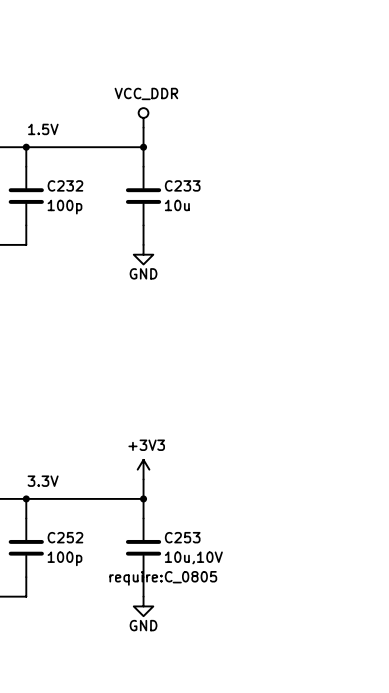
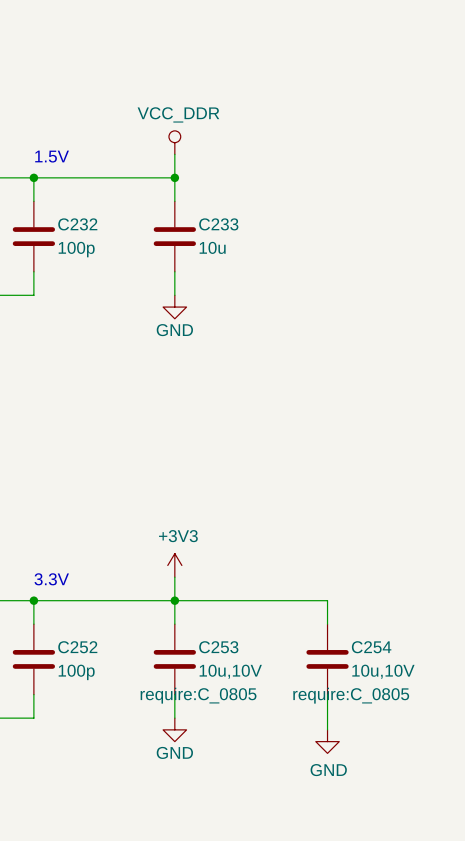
wire: none -> (174, 600) (327, 600) (327, 624)
C254: none -> 10u,10V (327, 659)
wire: none -> (327, 694) (327, 729)
power symbol: none -> GND (327, 741)

